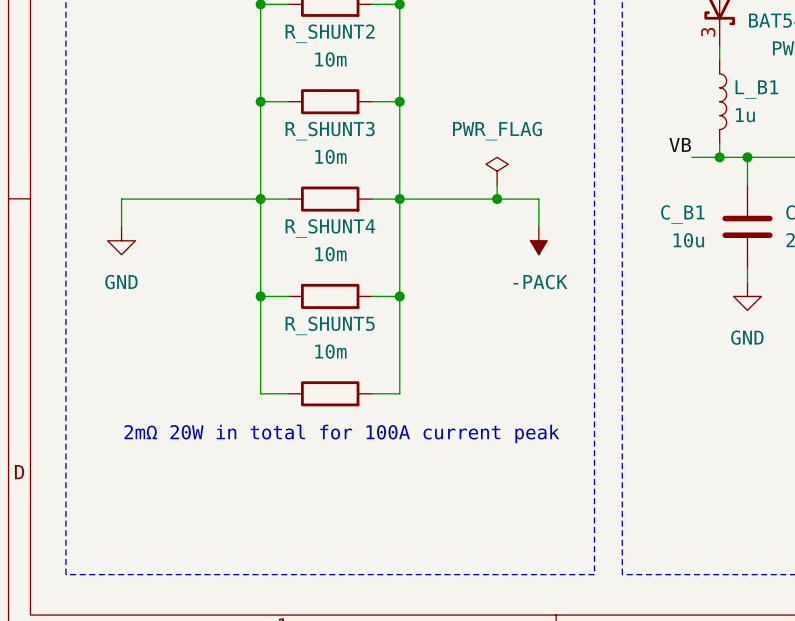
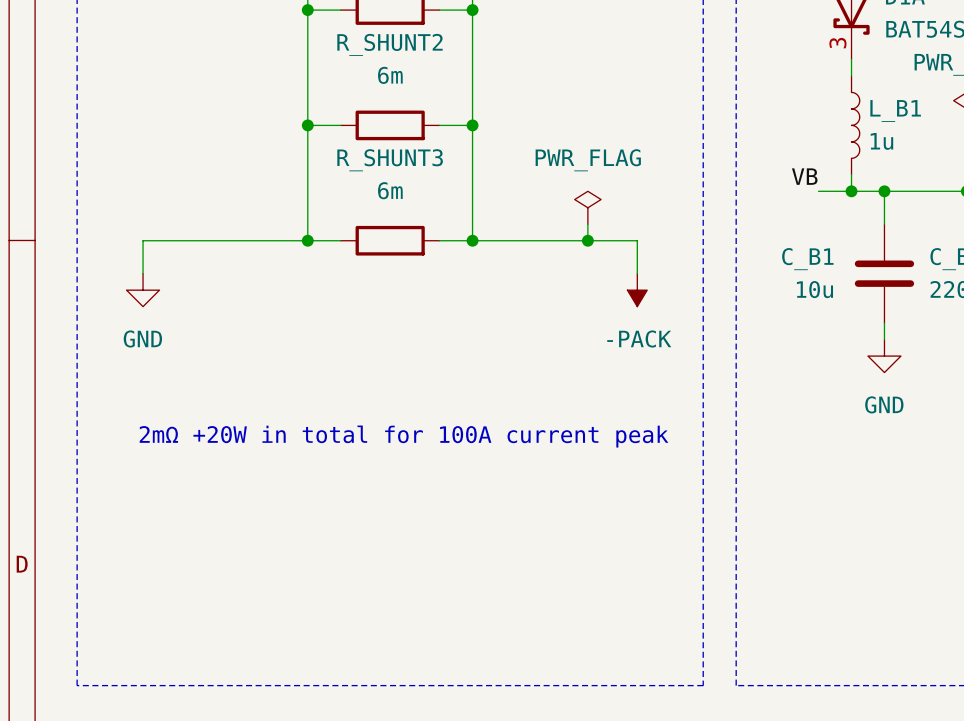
R_SHUNT2 value: 10m (330, 59) -> 6m (390, 75)
R_SHUNT3 value: 10m (330, 156) -> 6m (390, 190)
wire: (260, 199) (260, 393) (288, 393) -> none
wire: (399, 199) (399, 393) (371, 393) -> none
wire: (260, 296) (288, 296) -> none
junction: (260, 296) -> none
R_SHUNT4: 10m (330, 296) -> none
wire: (371, 296) (399, 296) -> none
junction: (399, 296) -> none
text: none -> 2mΩ +20W in total for 100A current peak (404, 436)
R_SHUNT5: 10m (330, 393) -> none
text: 2mΩ 20W in total for 100A current peak (341, 433) -> none

